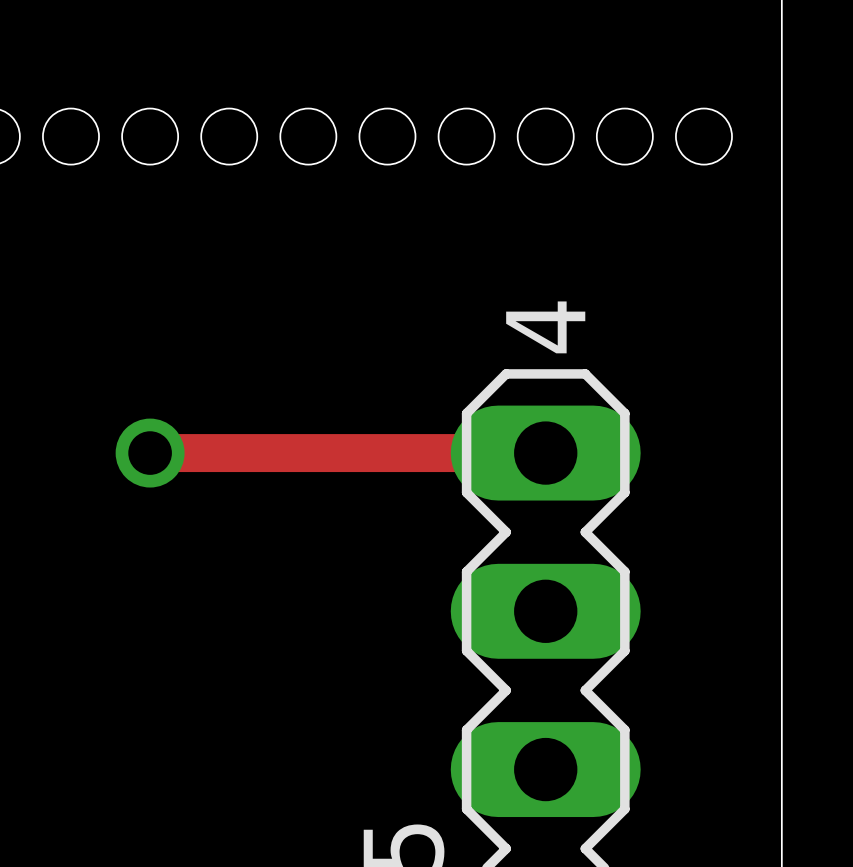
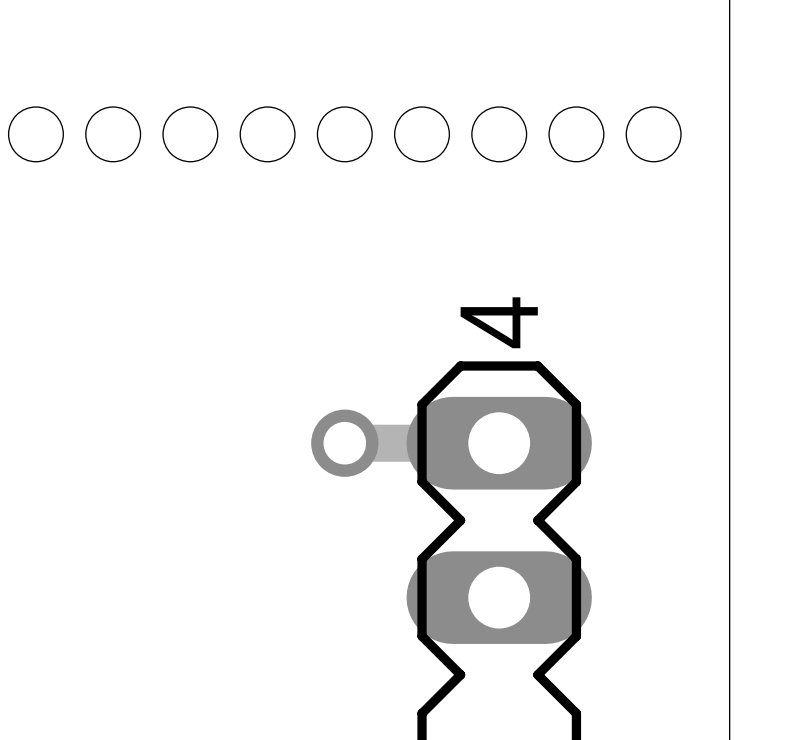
track: (150, 453) (387, 453) -> none
via position: (150, 453) -> (344, 443)

